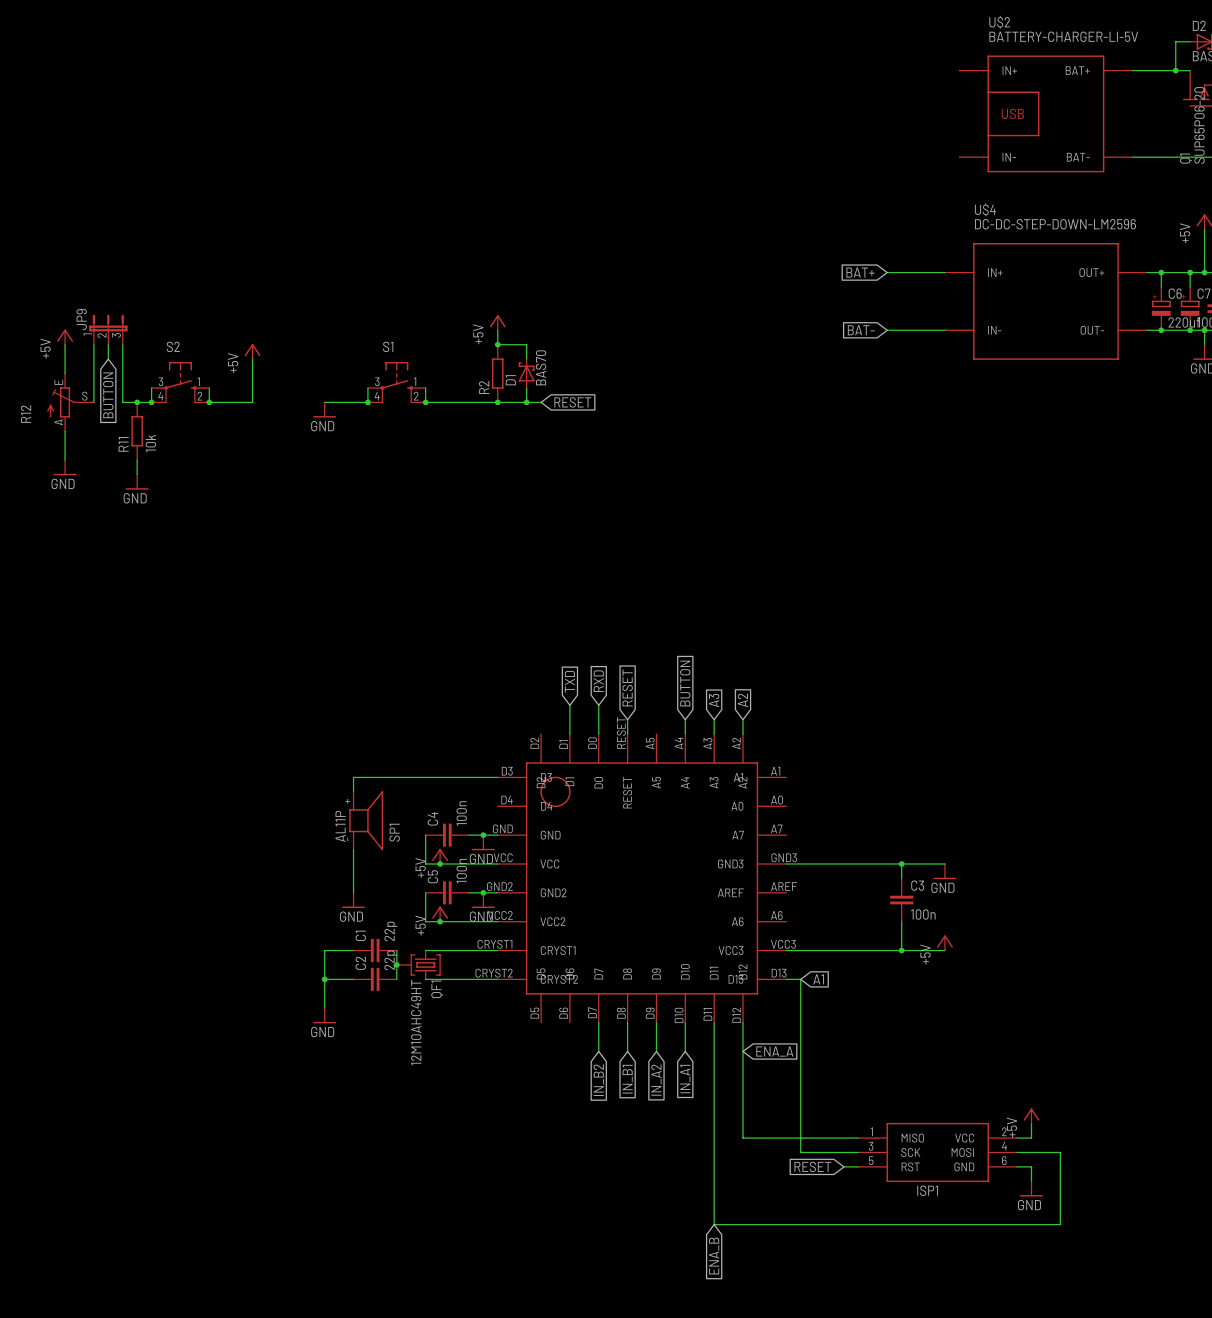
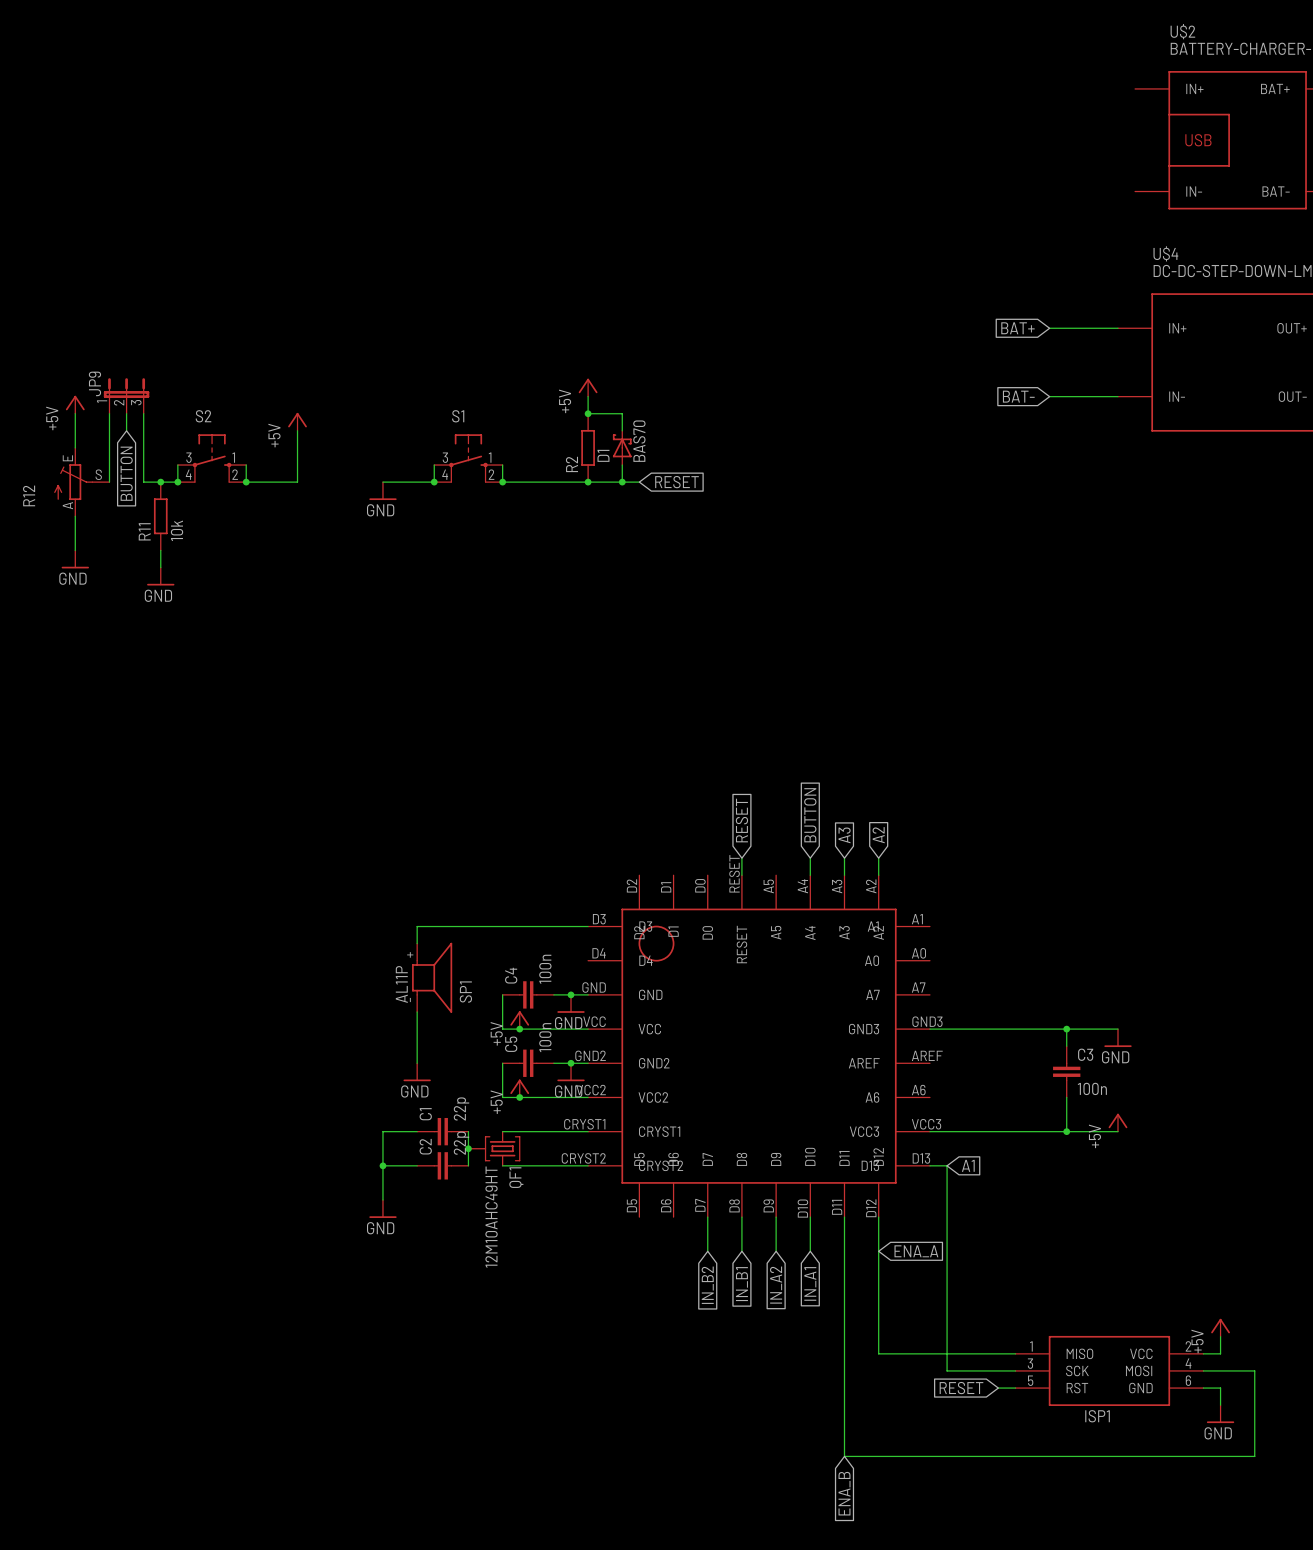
global label: TXD (569, 681) -> none
global label: RXD (598, 681) -> none
wire: (569, 705) (569, 734) -> none
wire: (598, 705) (598, 734) -> none

